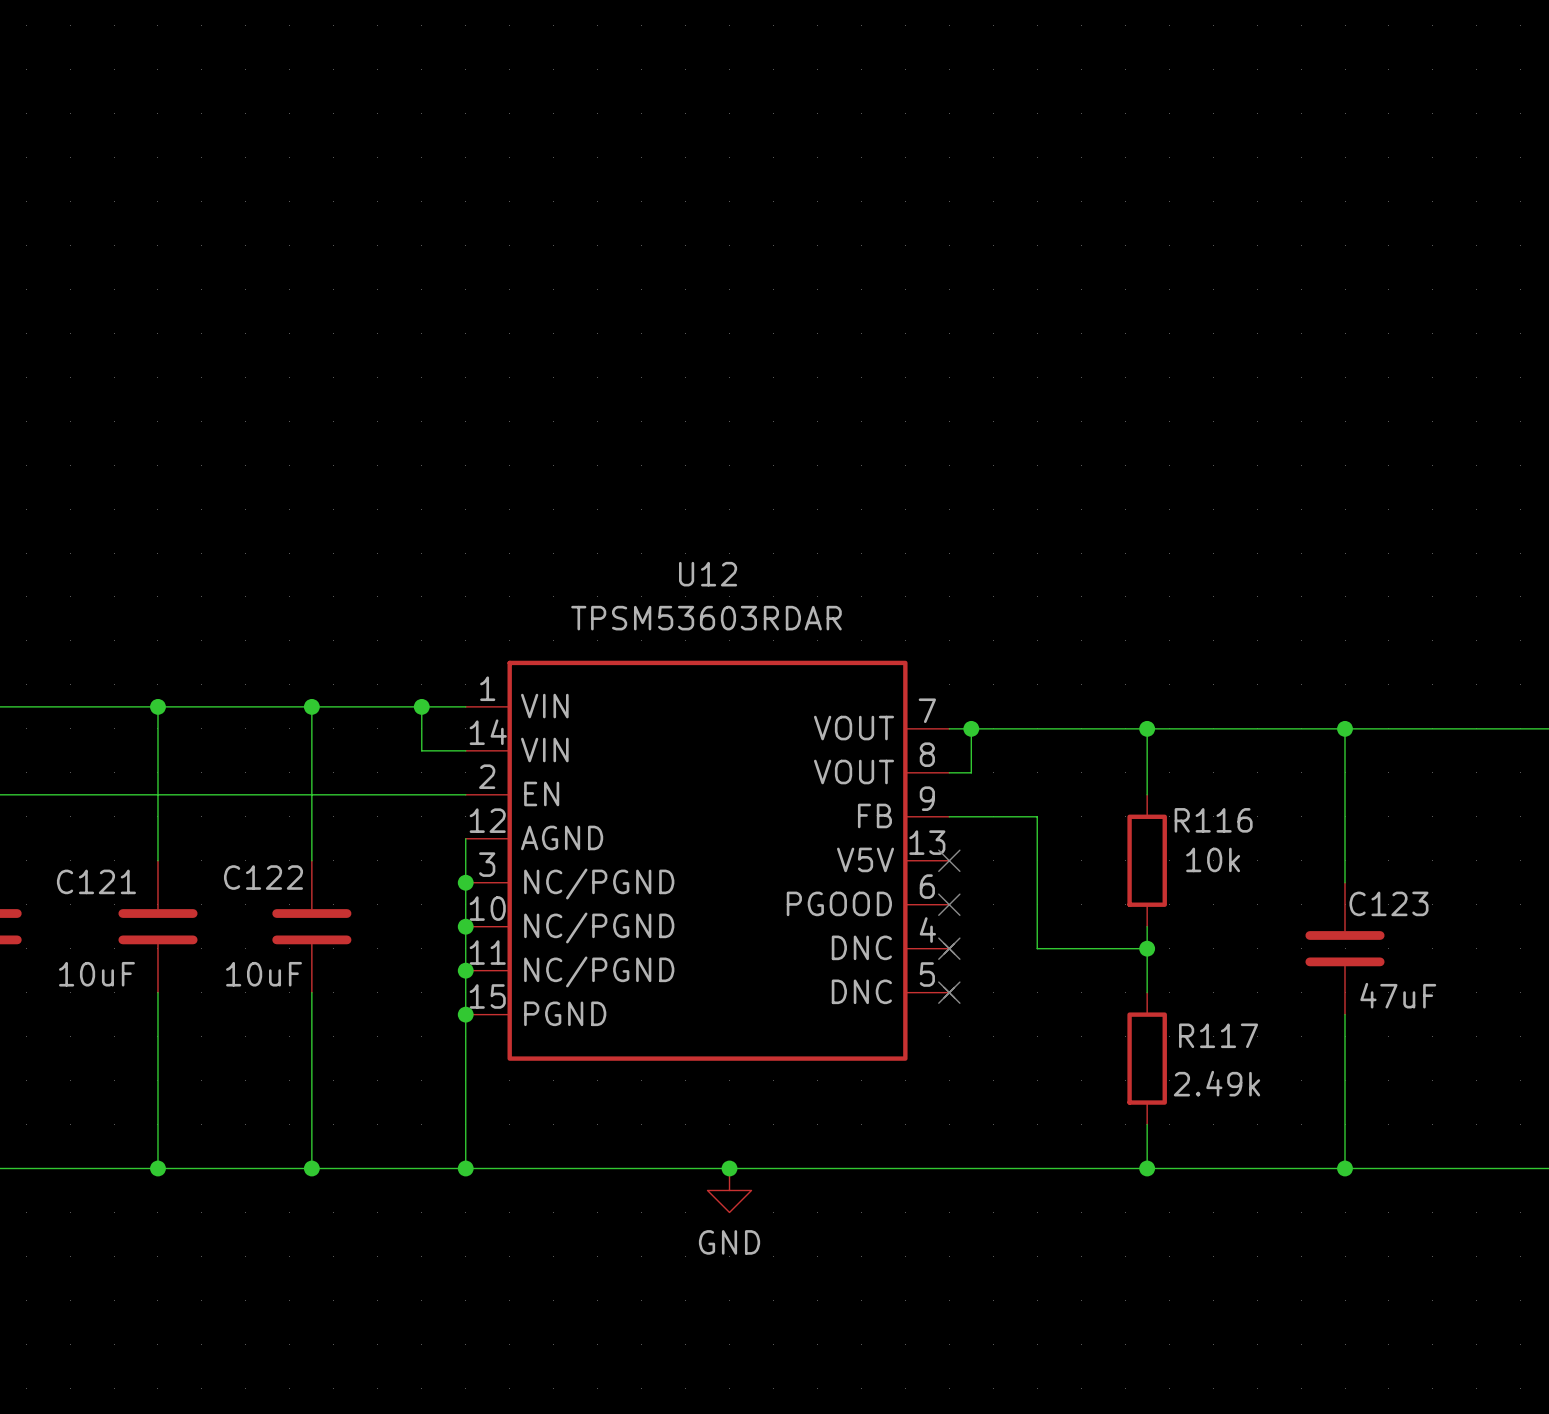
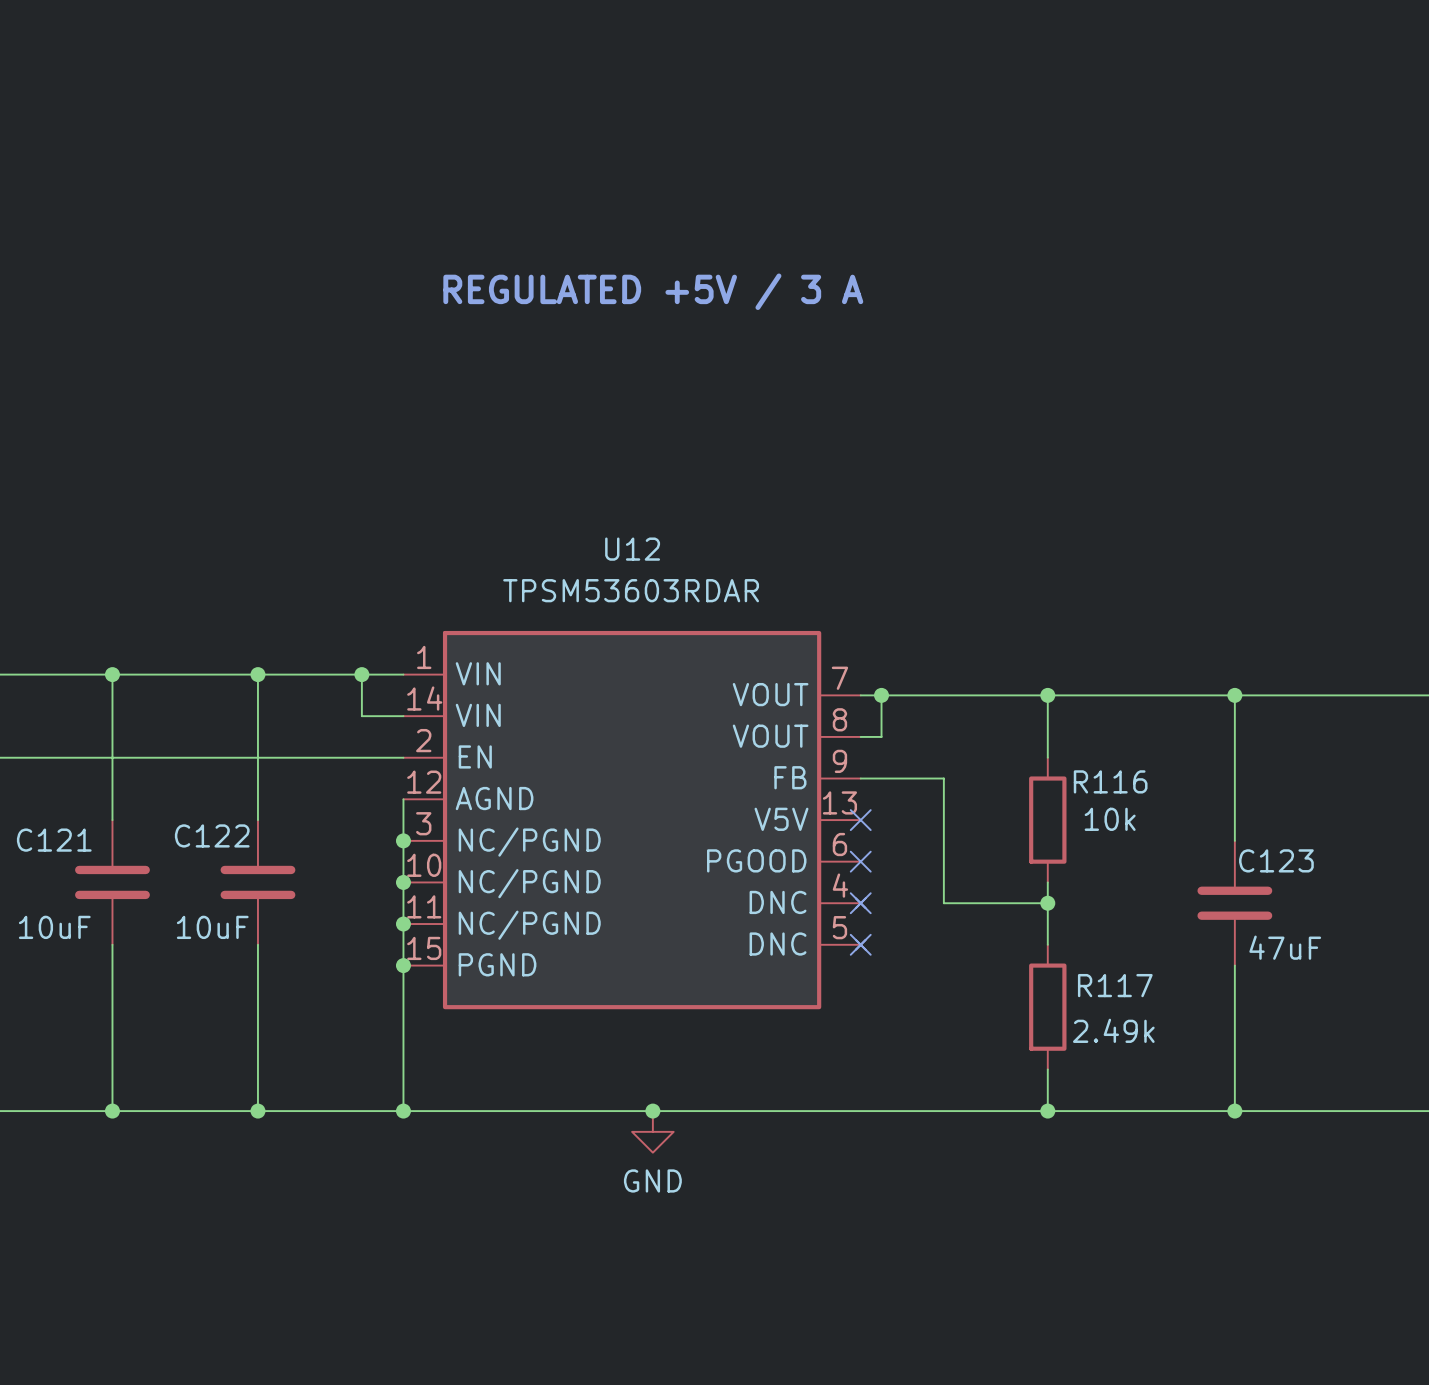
text: none -> REGULATED +5V / 3 A (653, 291)

